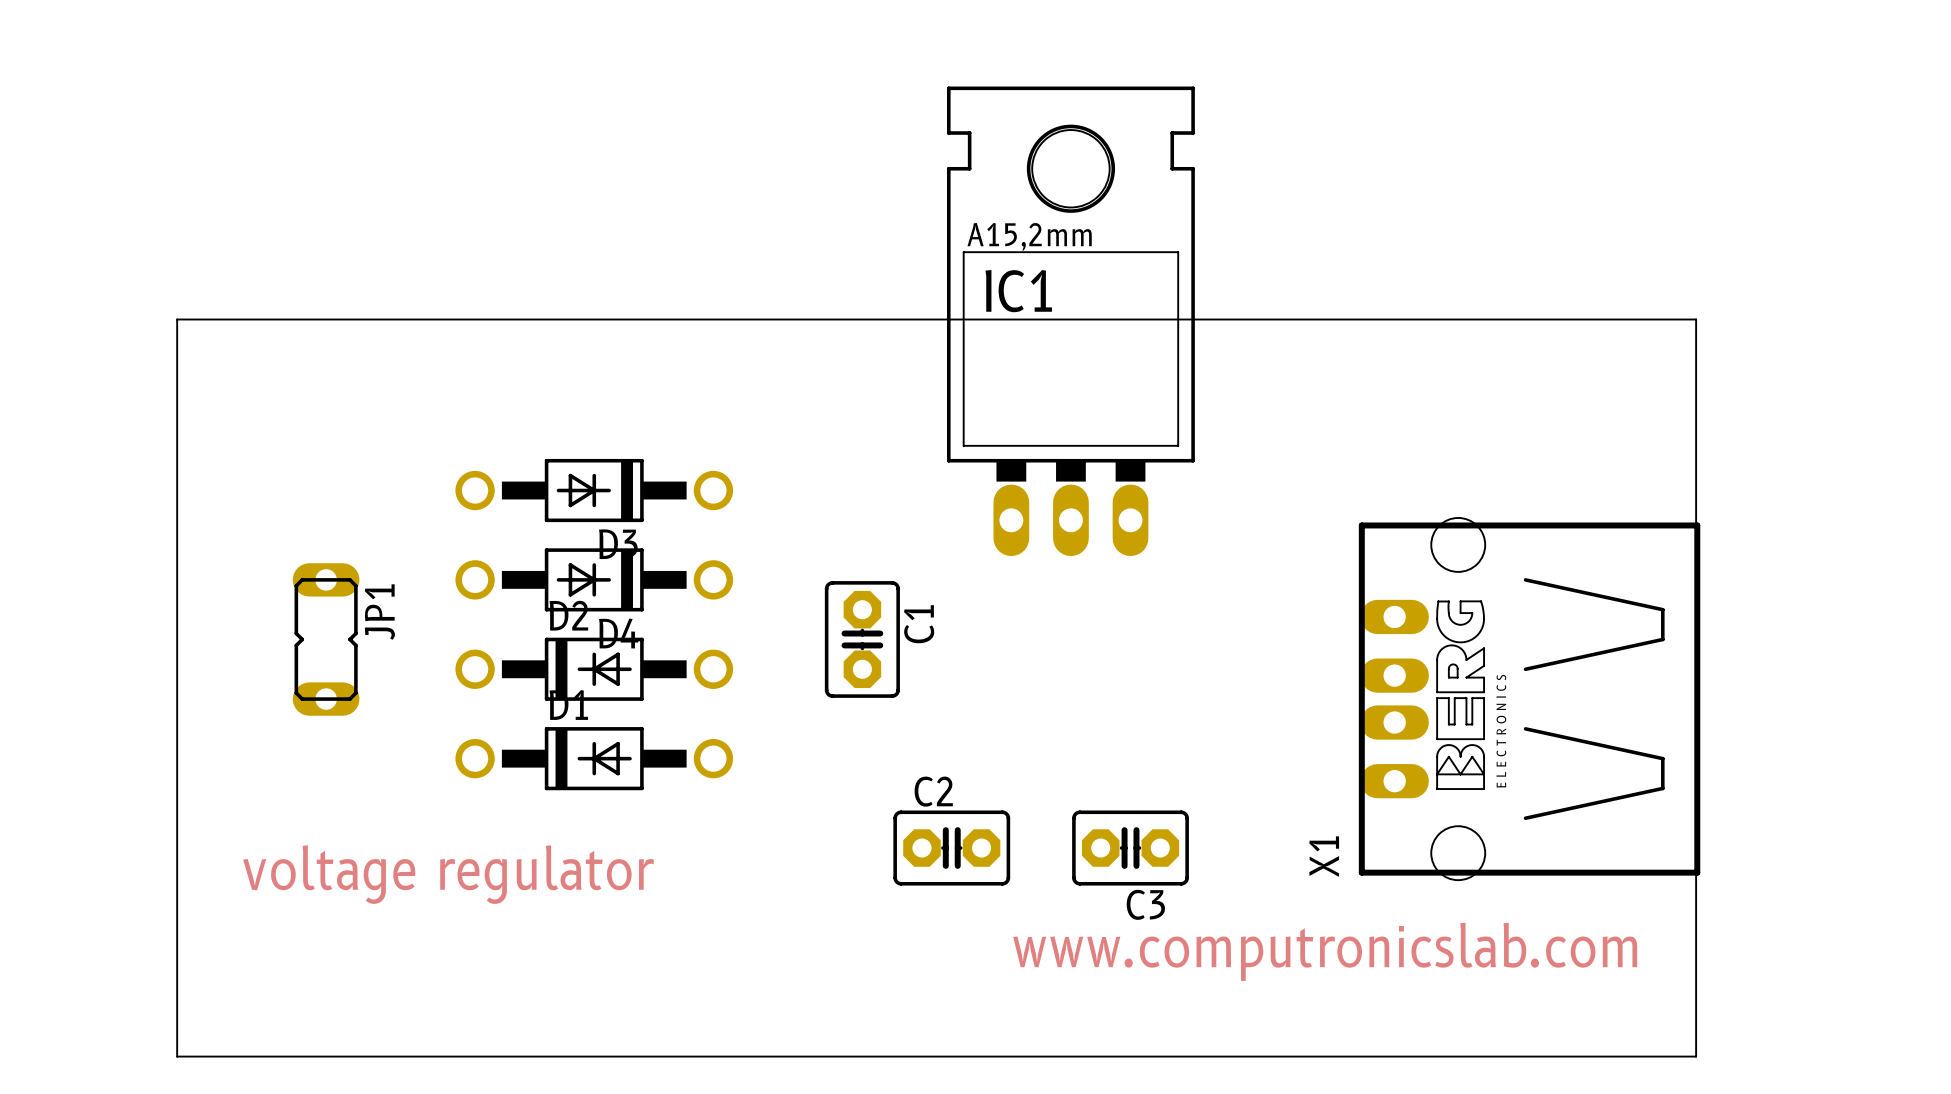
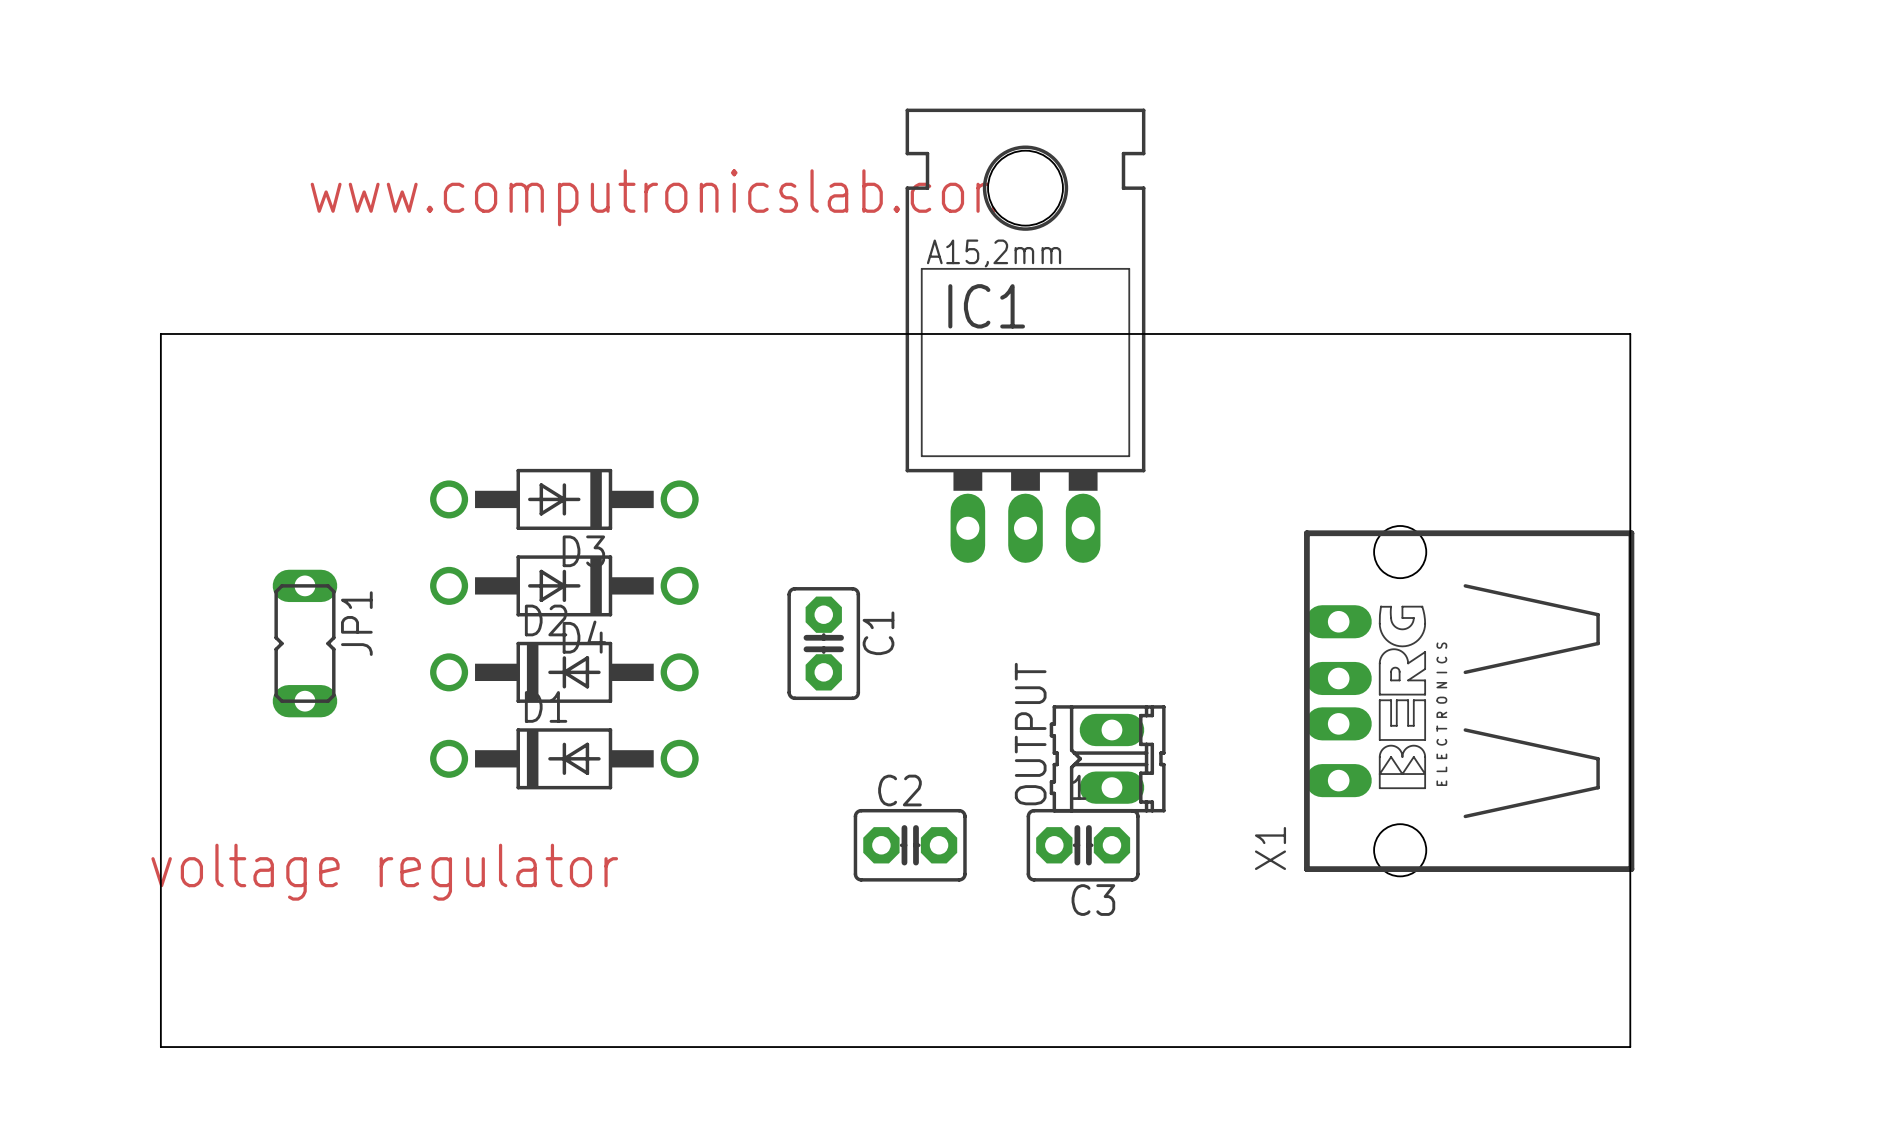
text: none -> www.computronicslab.com (660, 197)
OUTPUT: none -> (1107, 758)
text: www.computronicslab.com (1325, 951) -> none

